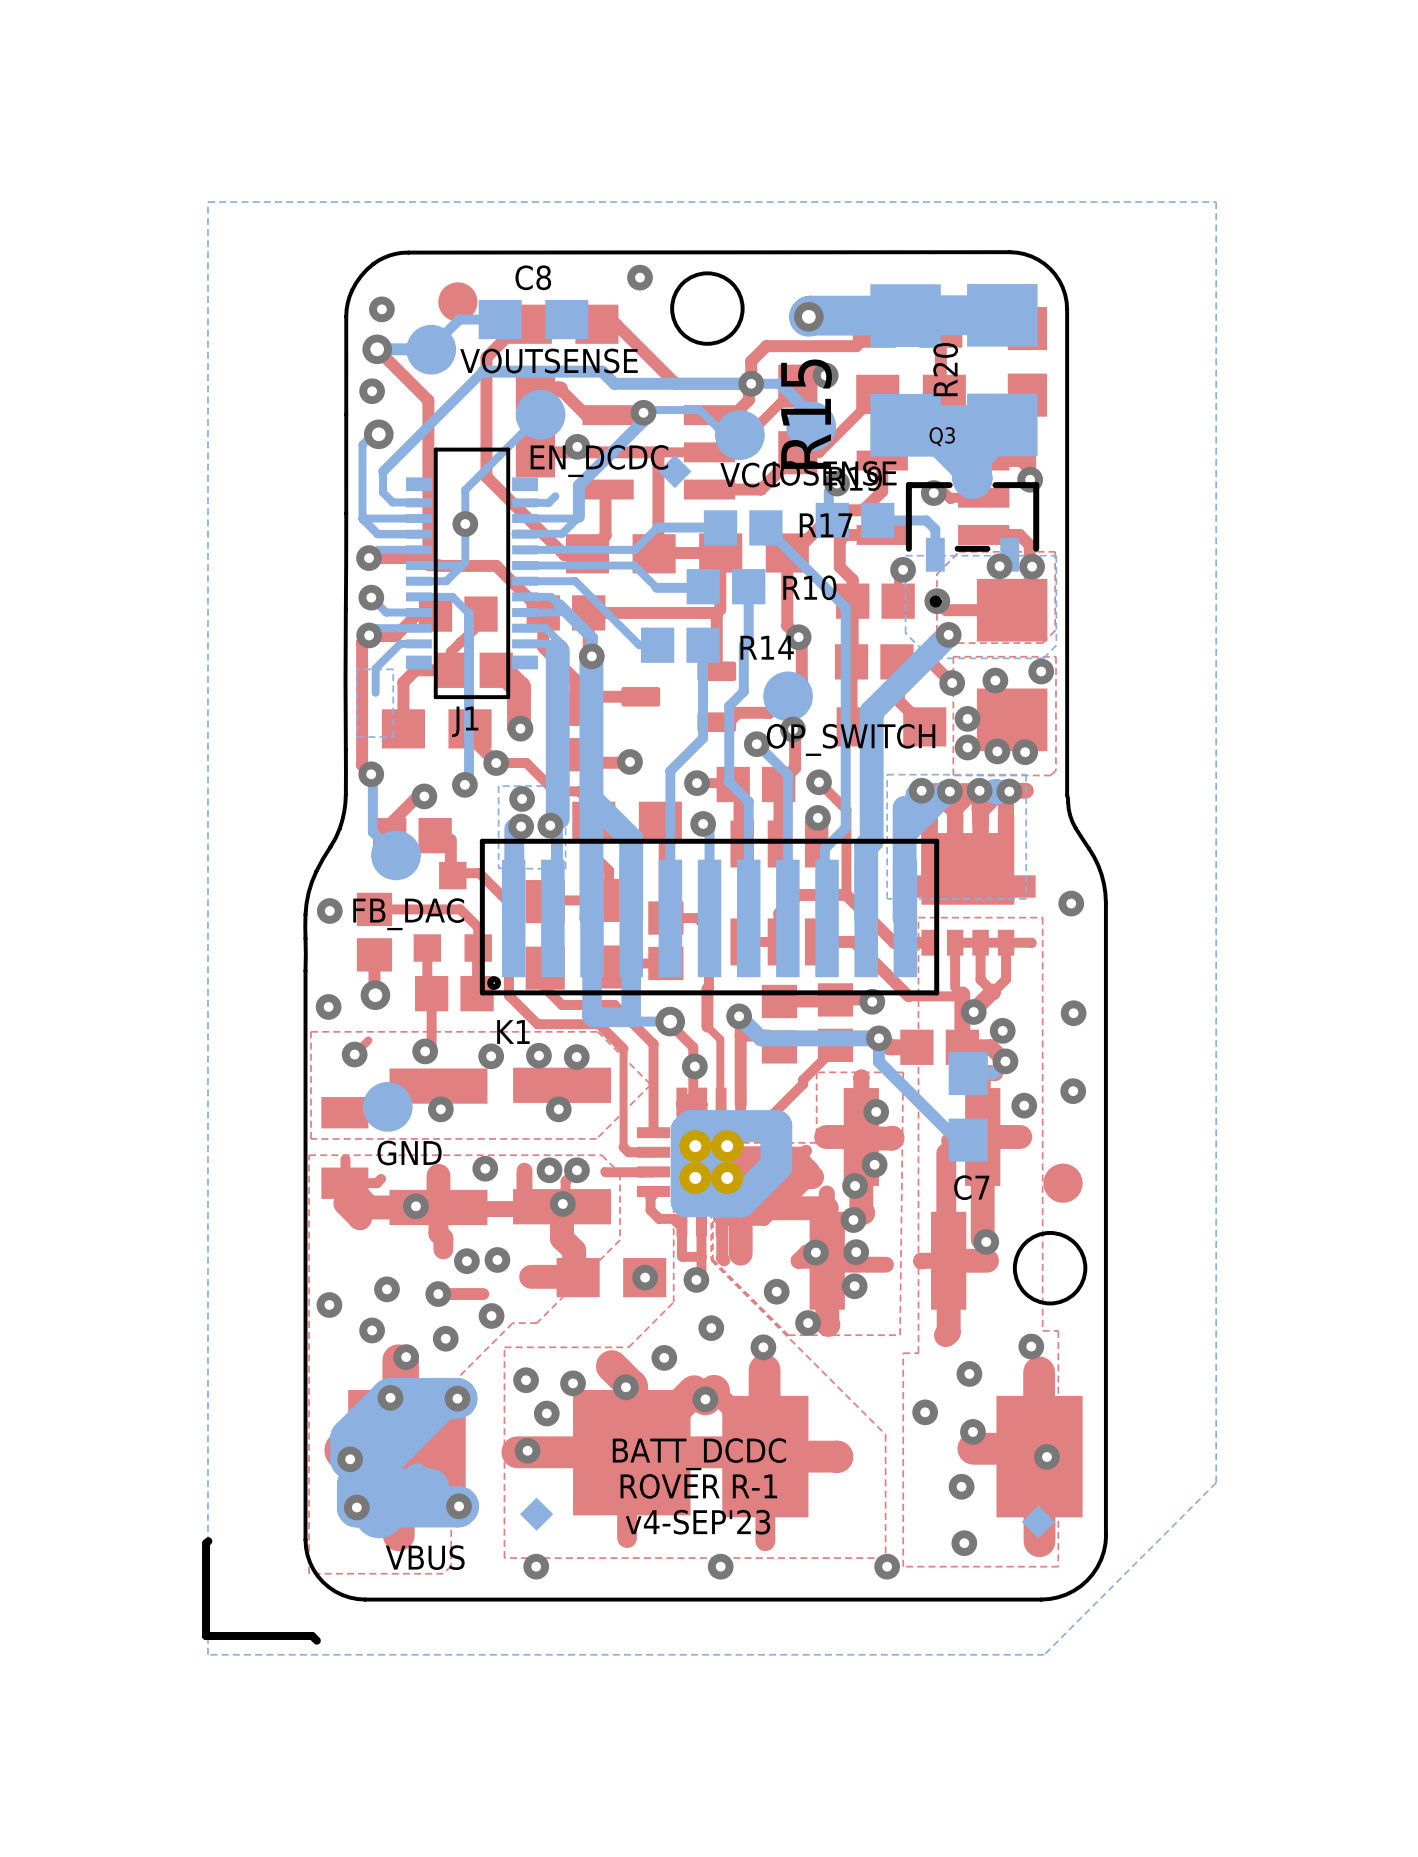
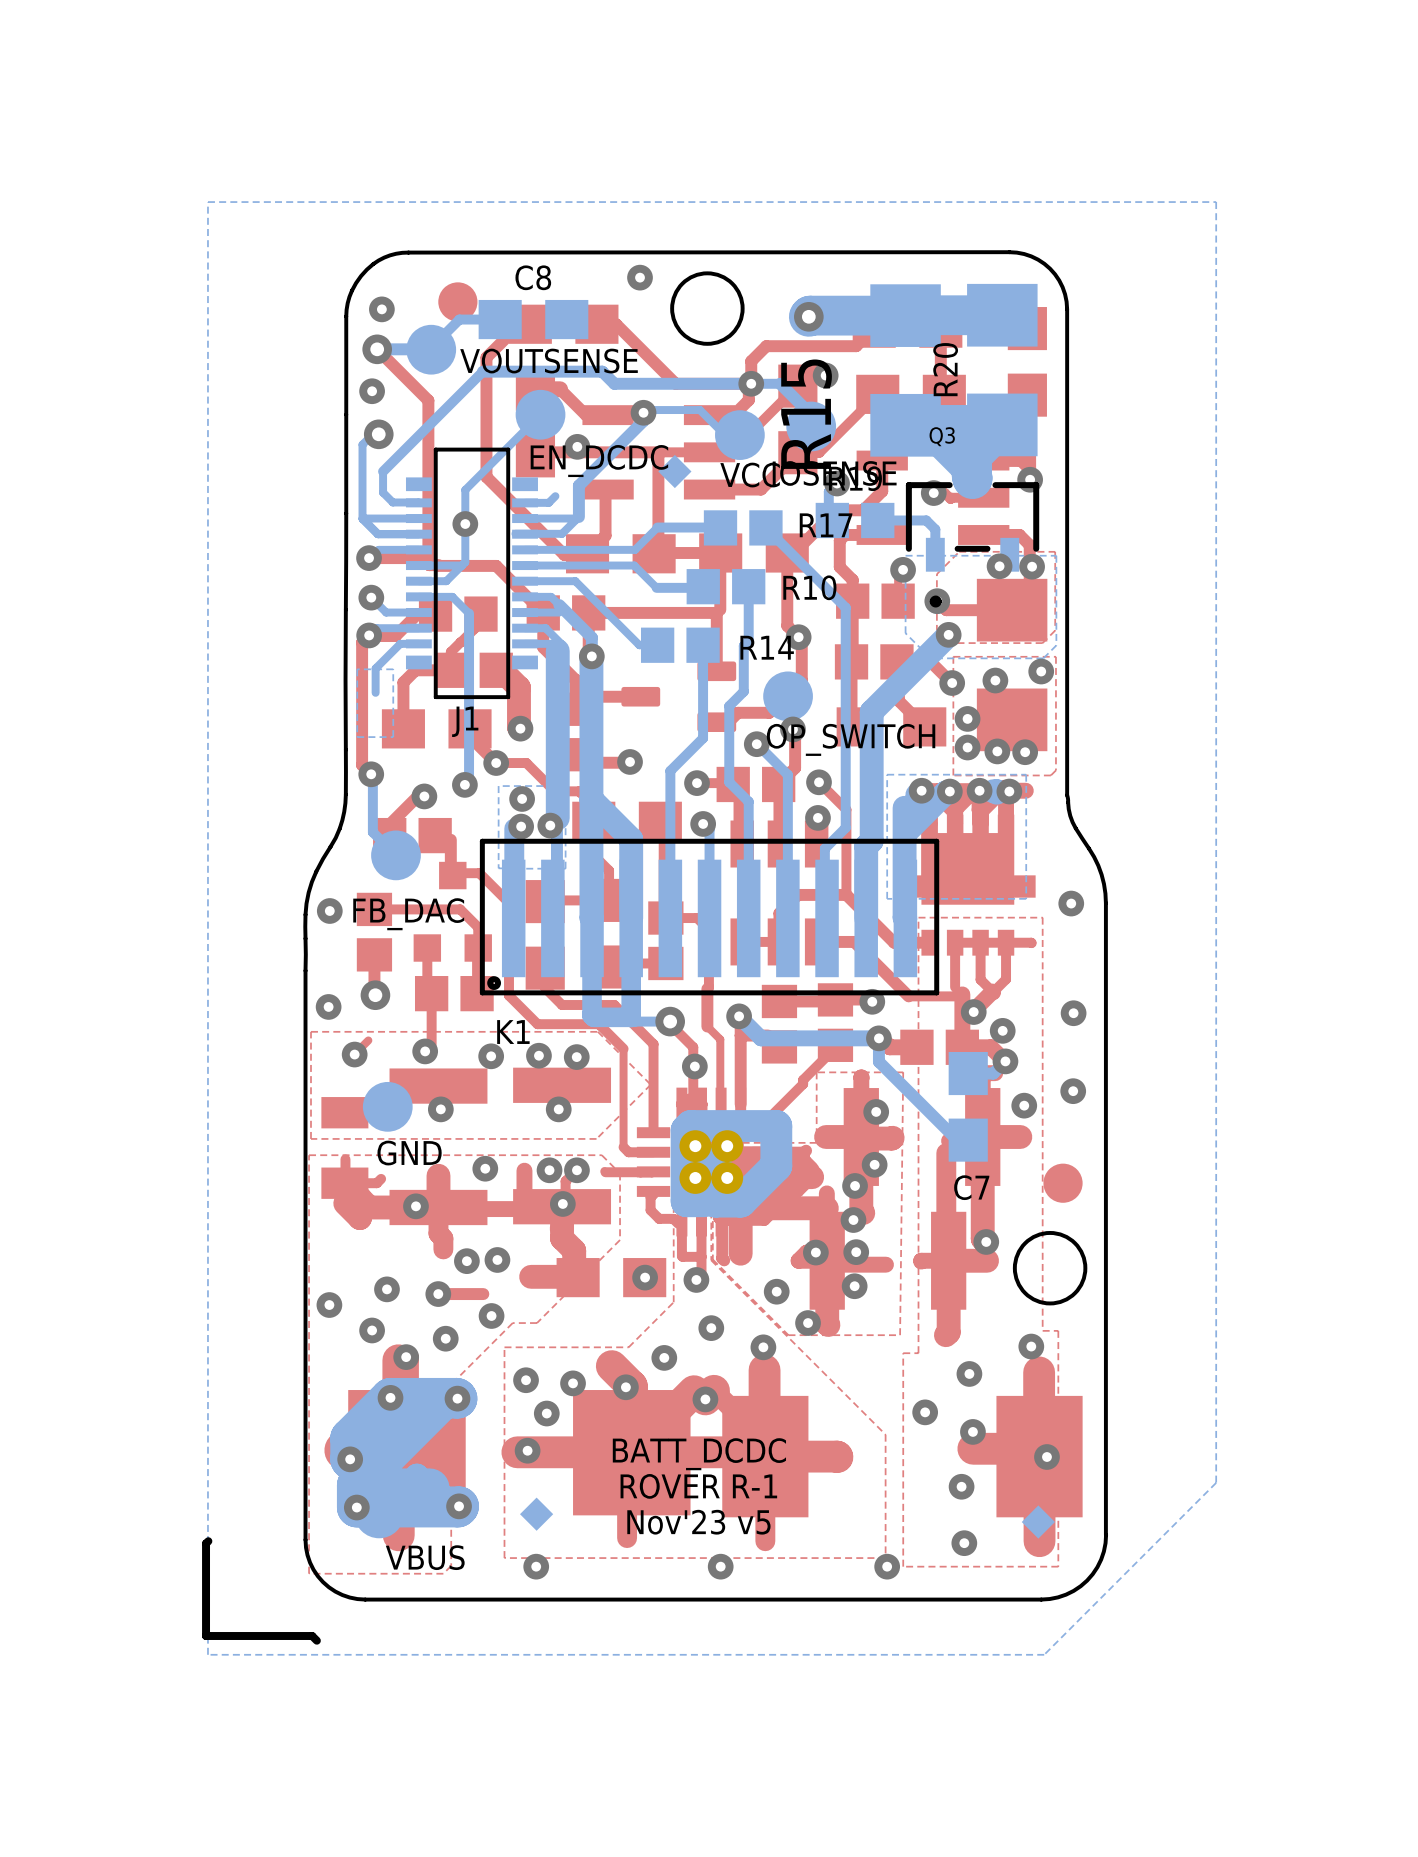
text: v4-SEP'23 (698, 1522) -> Nov'23 v5 (698, 1522)

